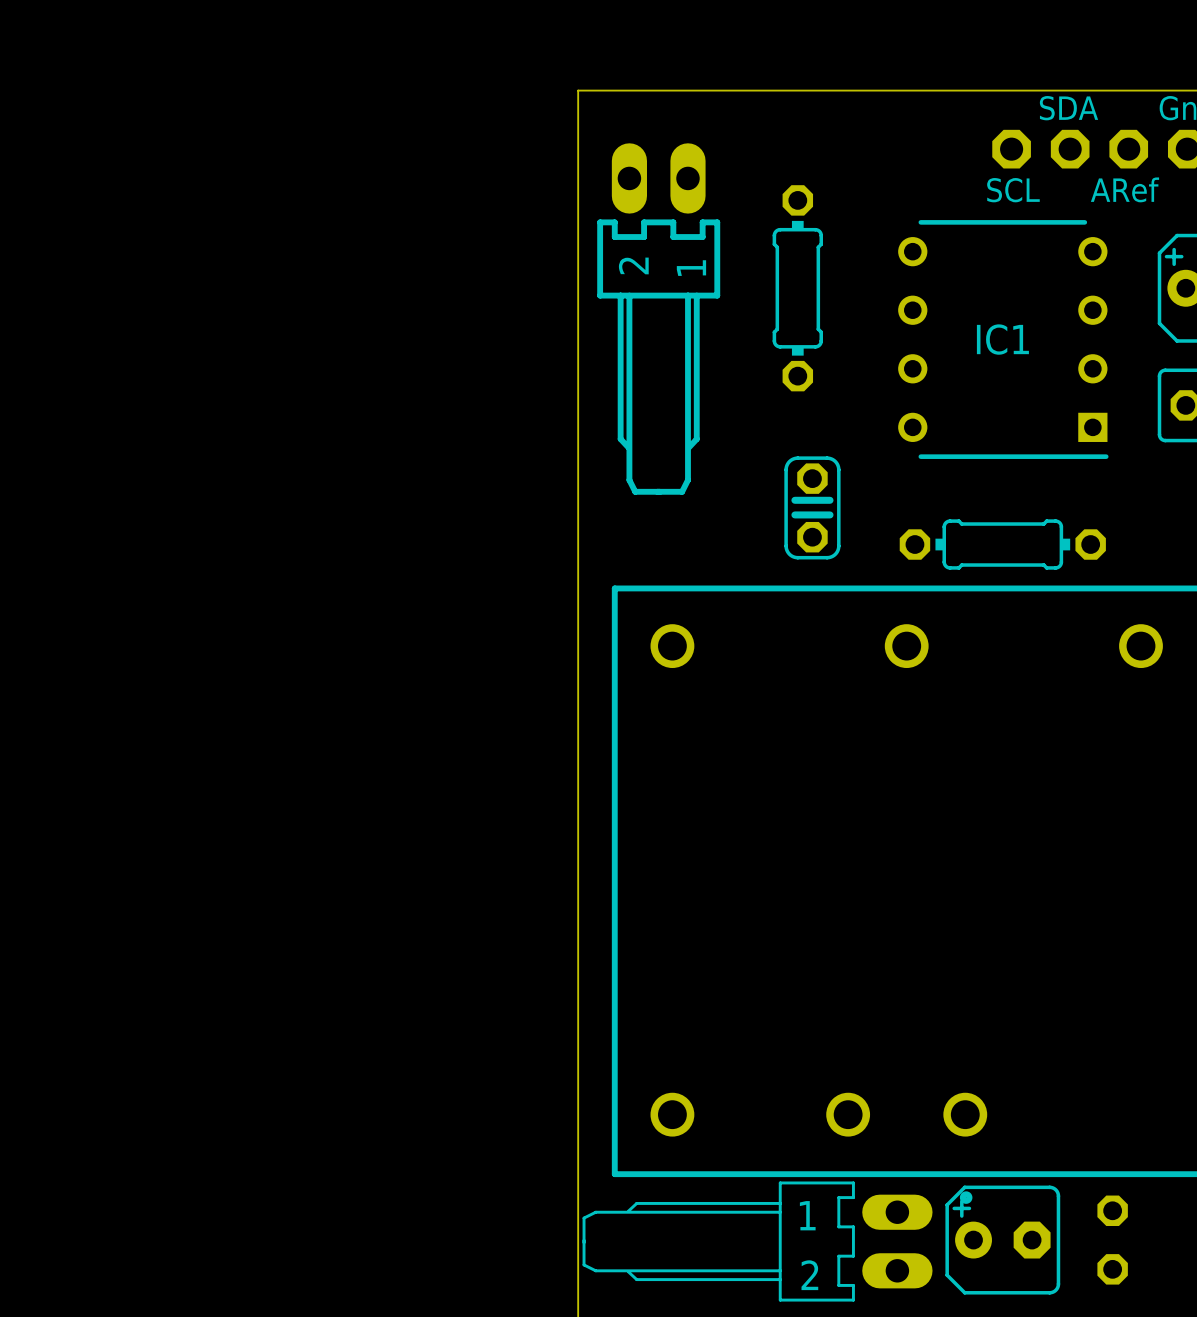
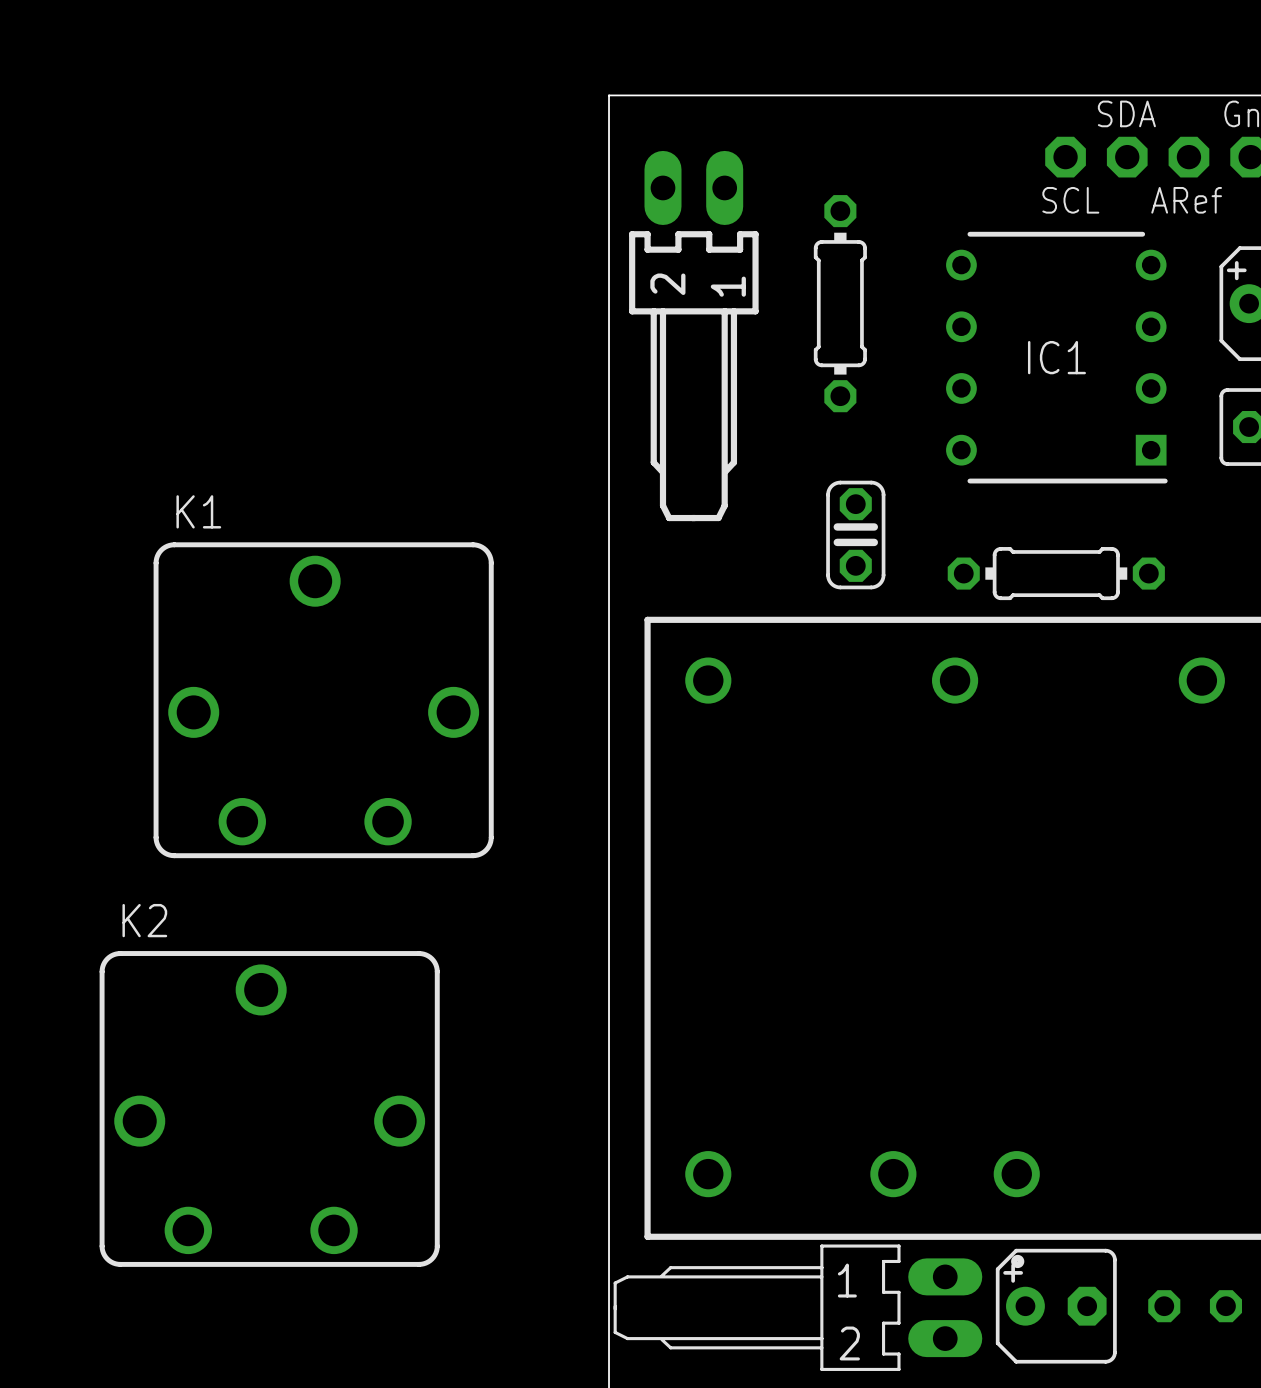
K1: none -> (323, 700)
K2: none -> (269, 1108)
part rotation: 0° (1112, 1240) -> 90° clockwise (1195, 1306)

